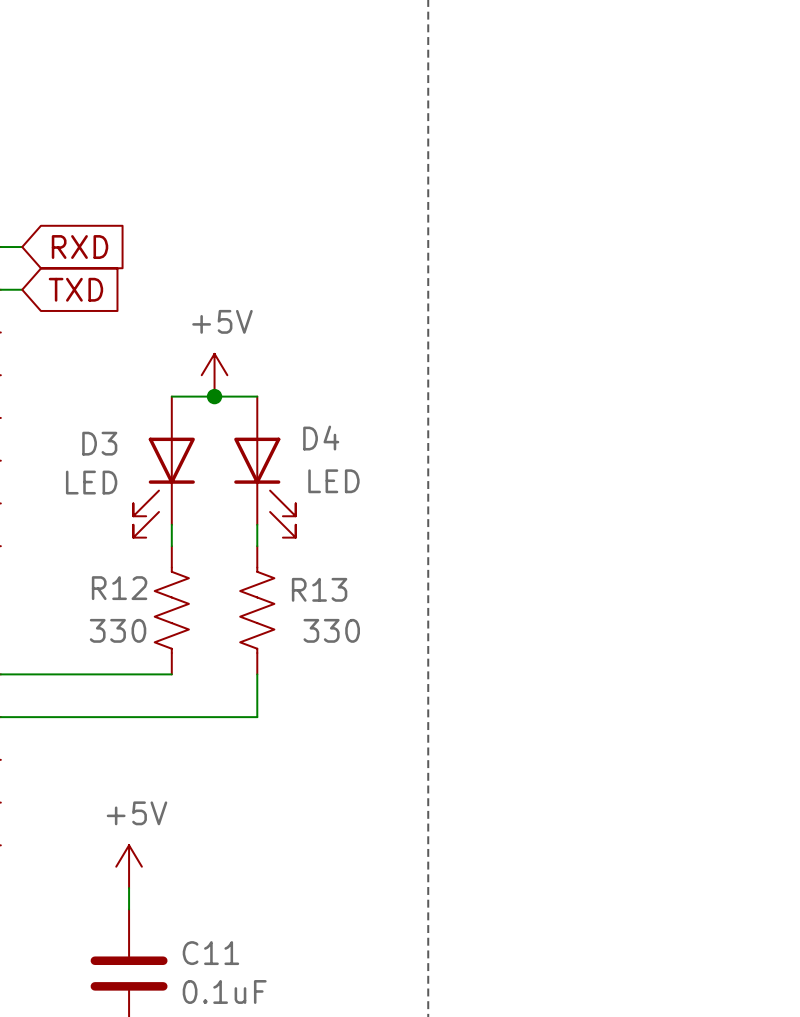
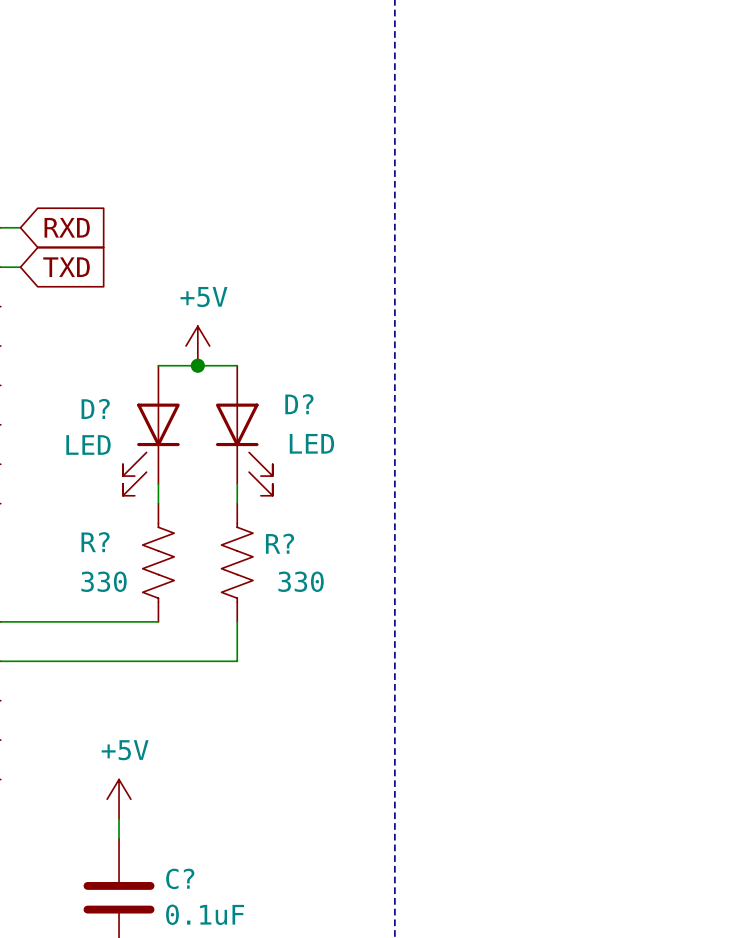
D4 name: D4 (321, 438) -> D? (299, 404)
D3 name: D3 (99, 443) -> D? (95, 408)
R12 name: R12 (119, 588) -> R? (95, 542)
R13 name: R13 (319, 589) -> R? (279, 543)
C11 name: C11 (210, 953) -> C? (180, 878)

